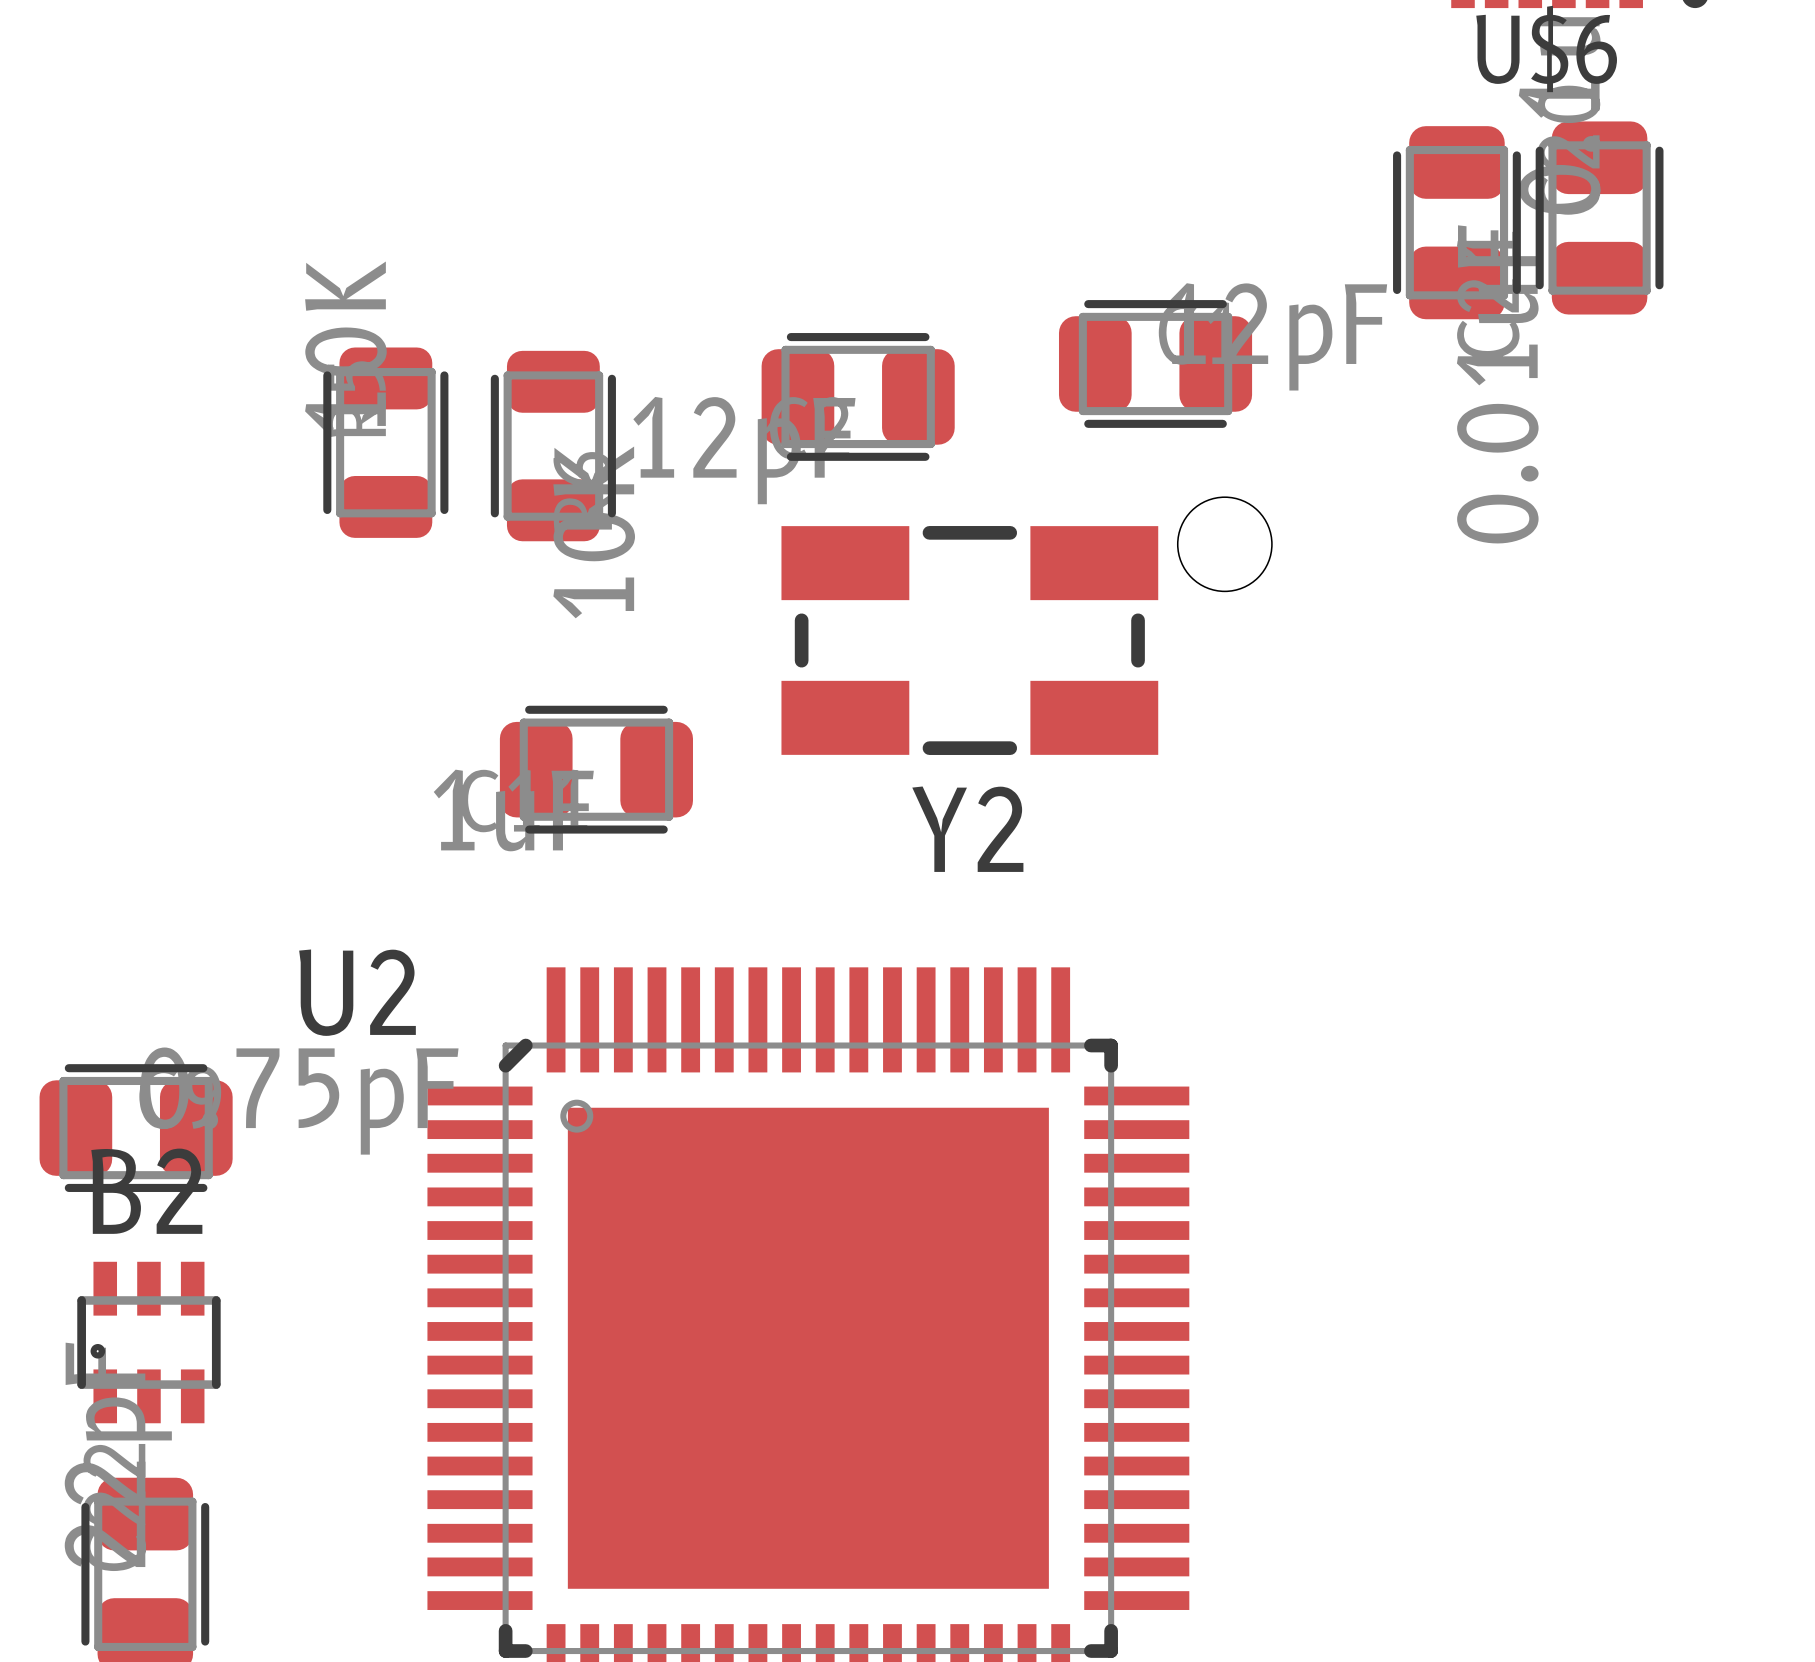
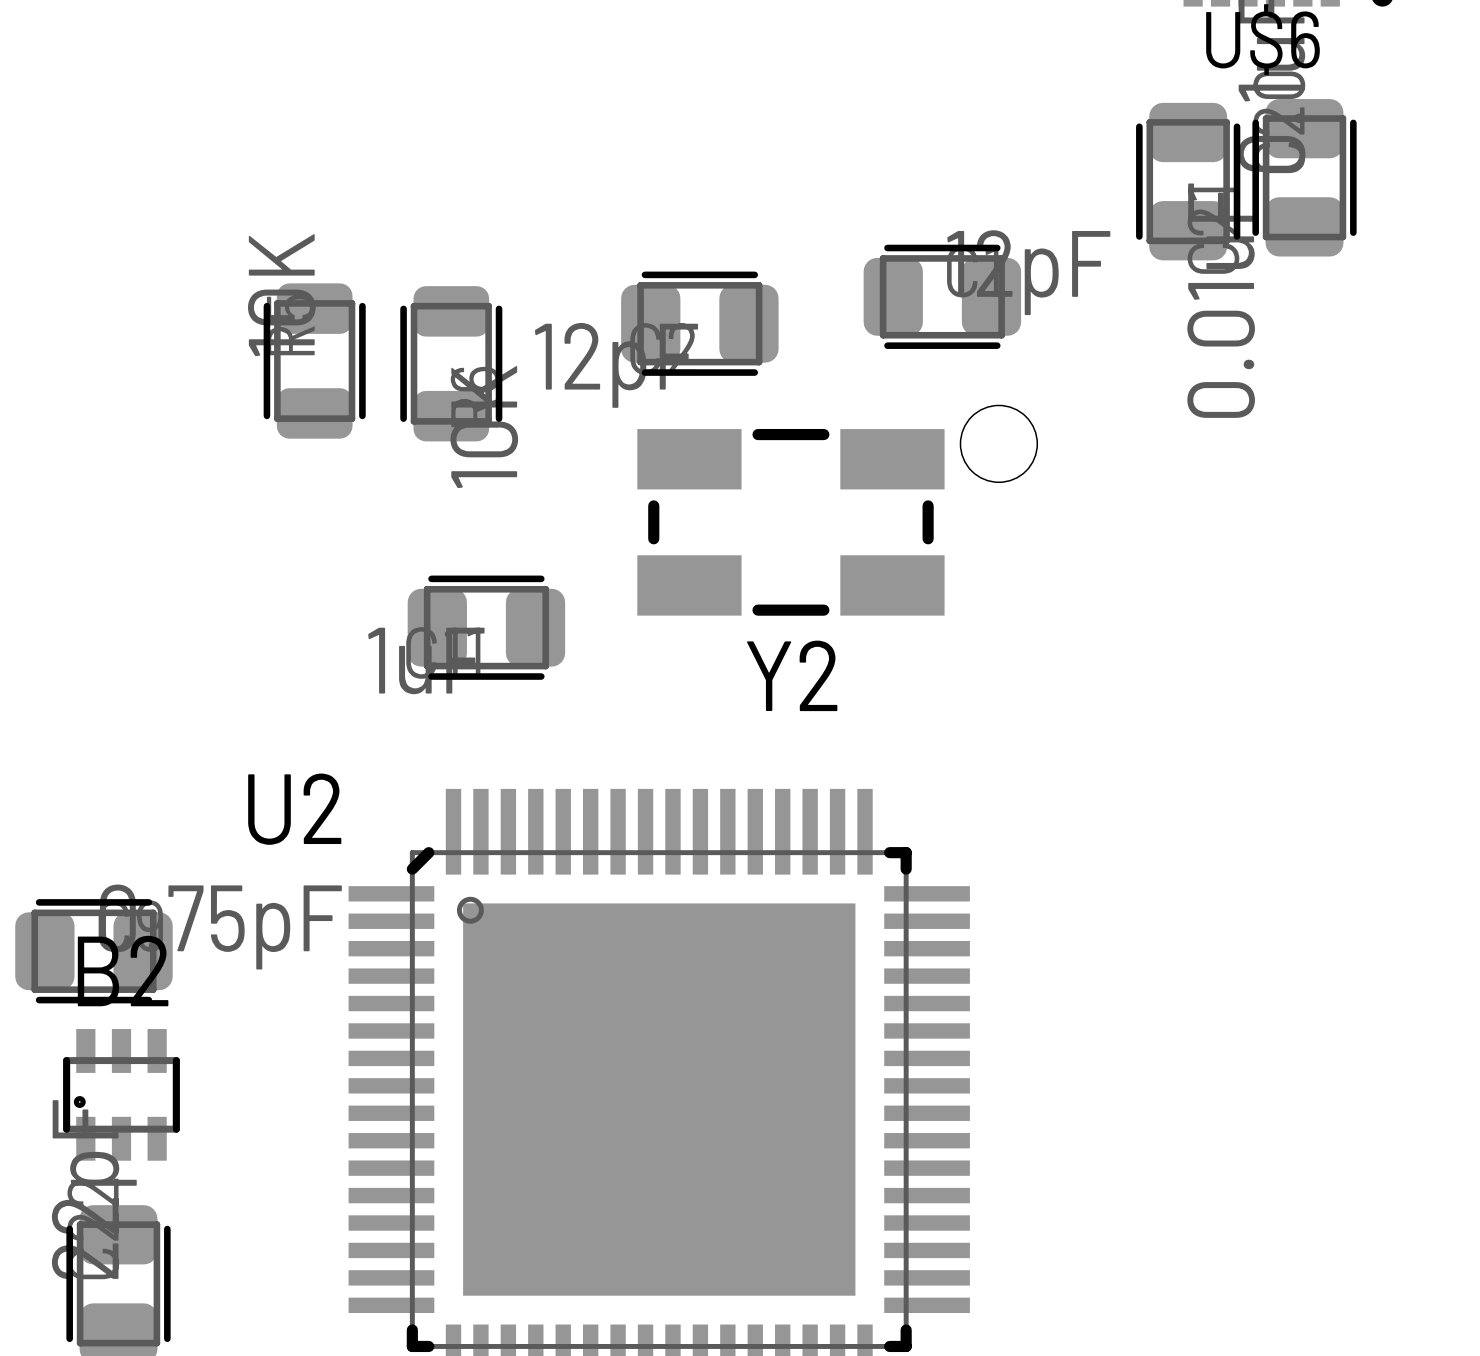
part position: (136, 1128) -> (93, 951)

